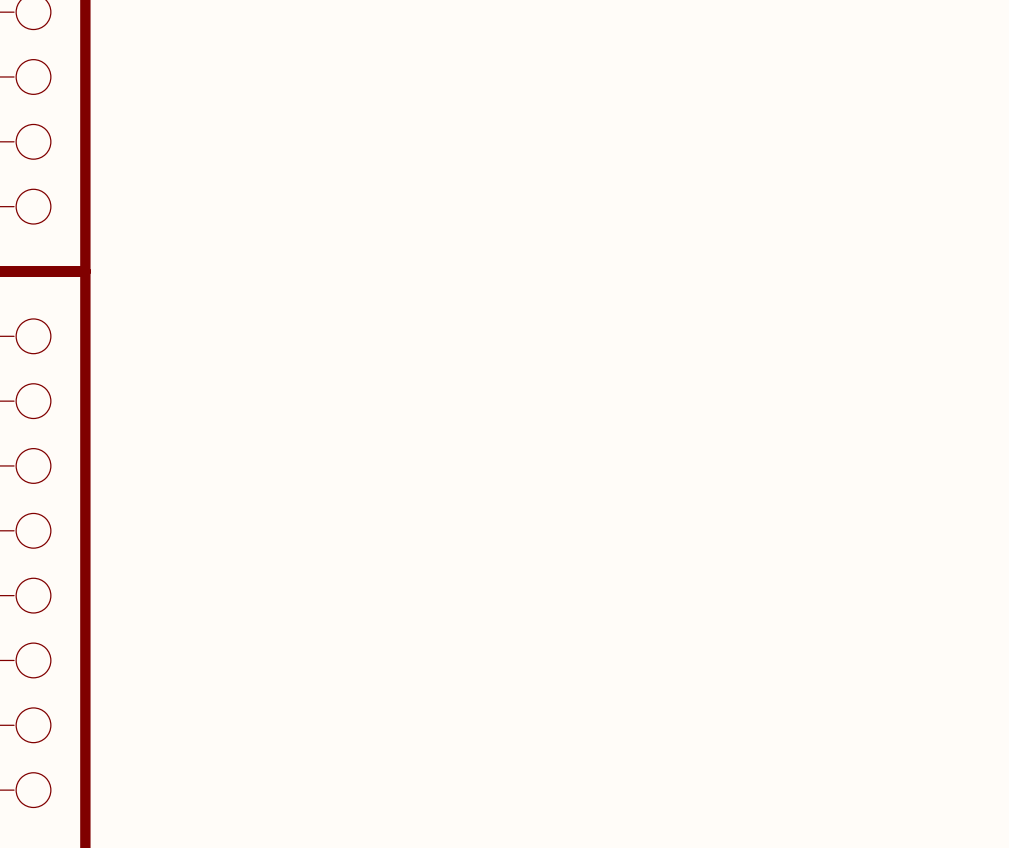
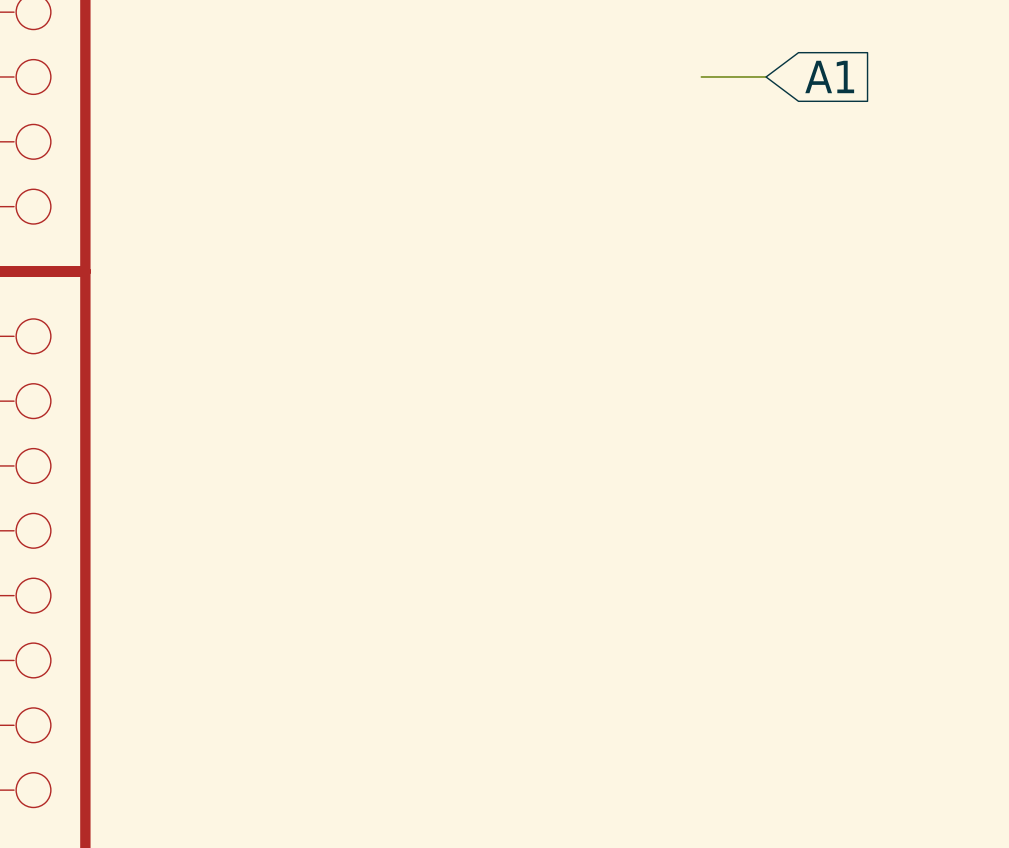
wire: none -> (701, 76) (766, 76)
global label: none -> A1 (829, 76)

